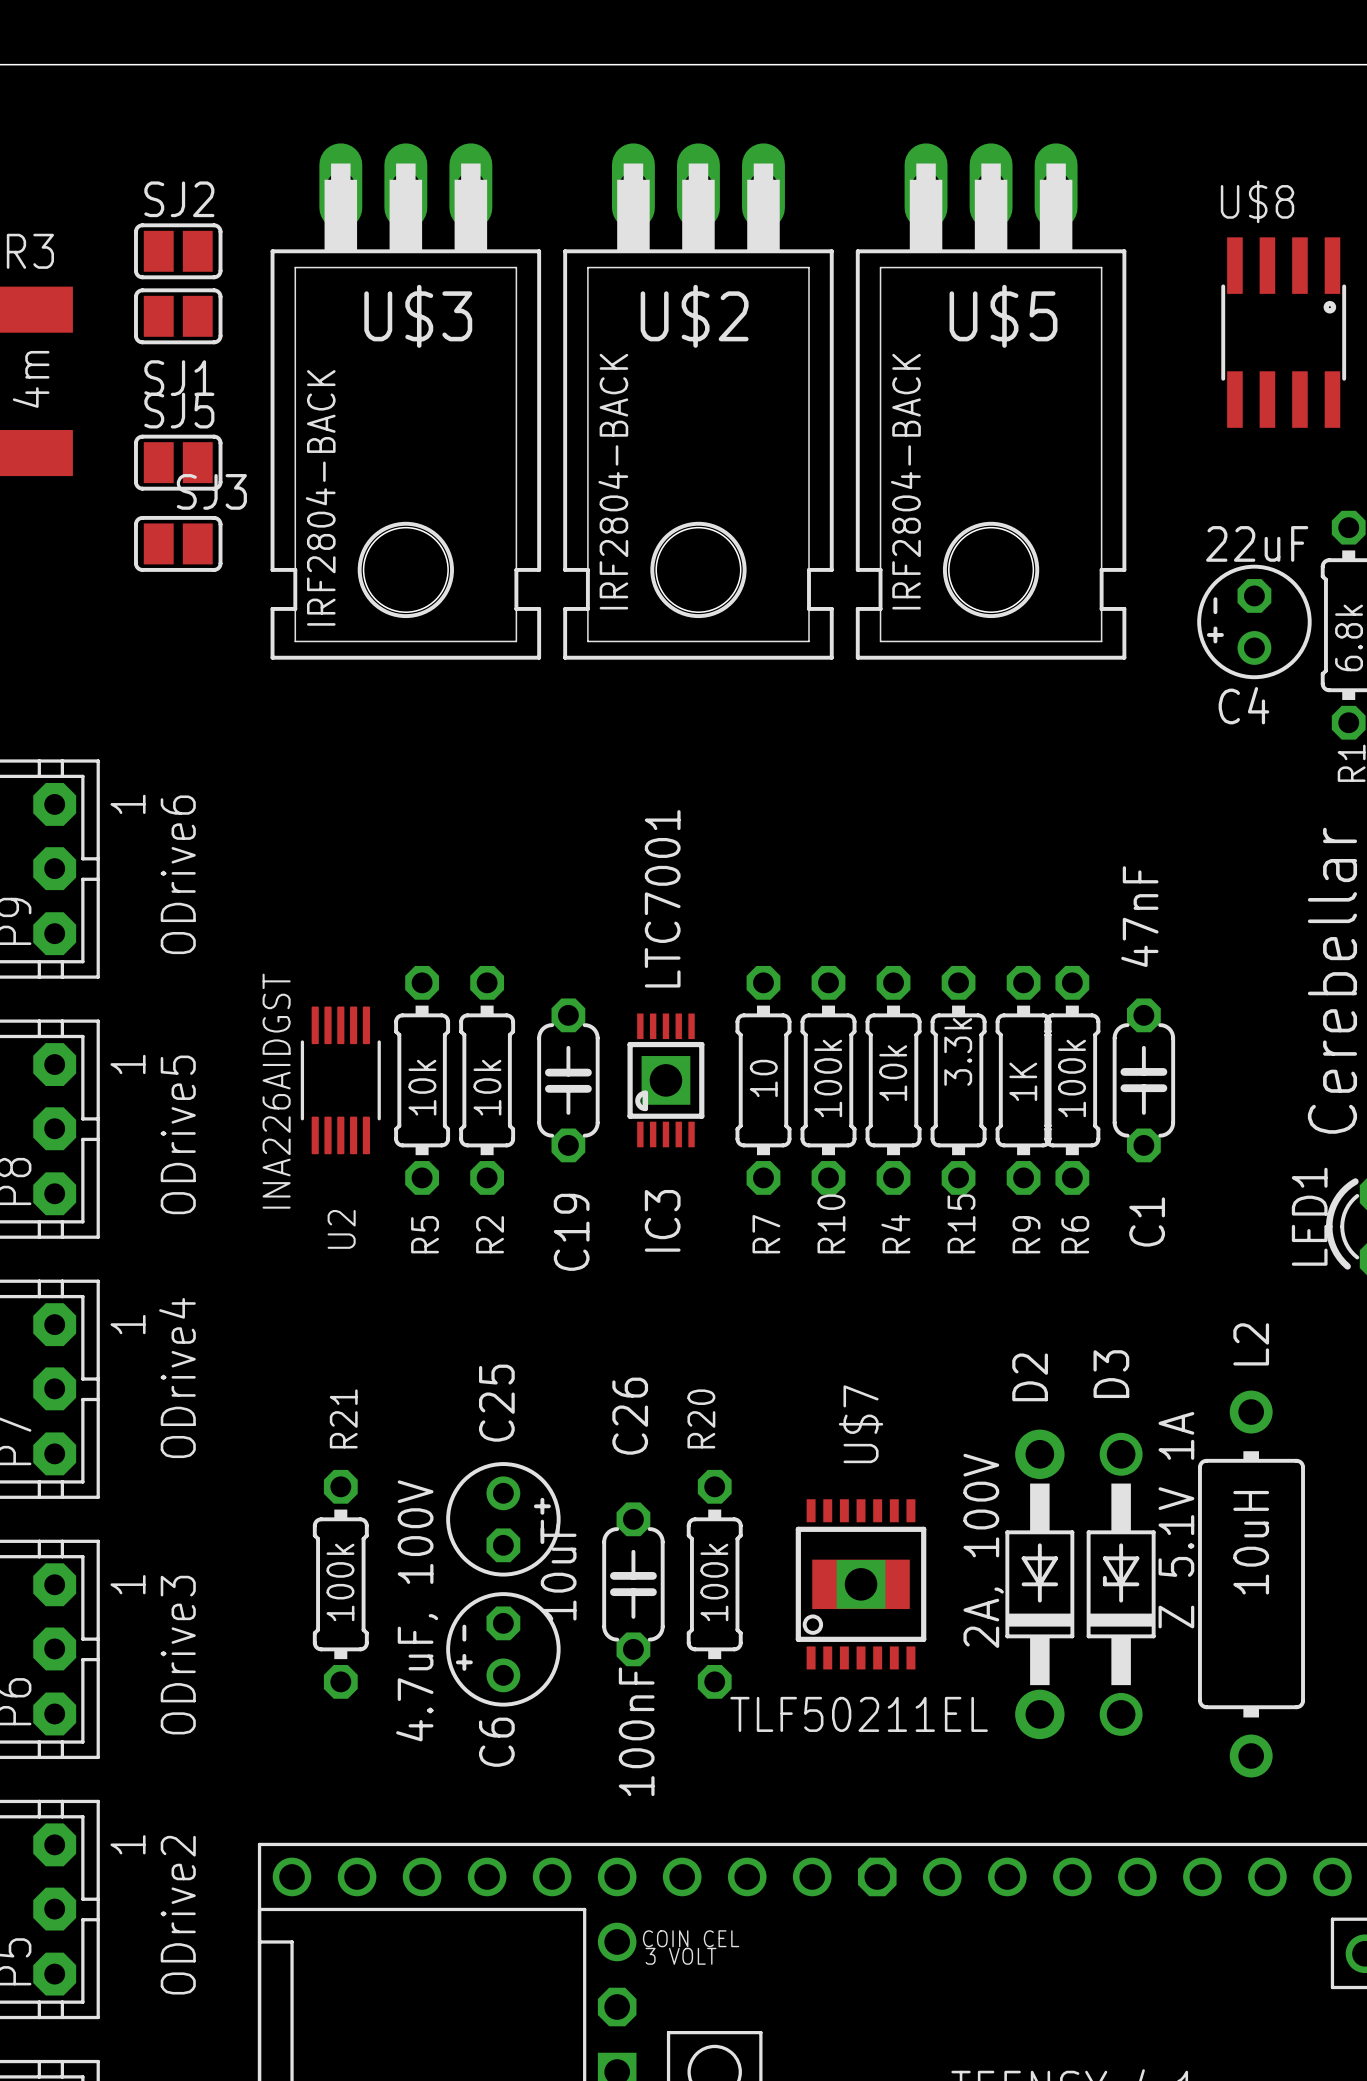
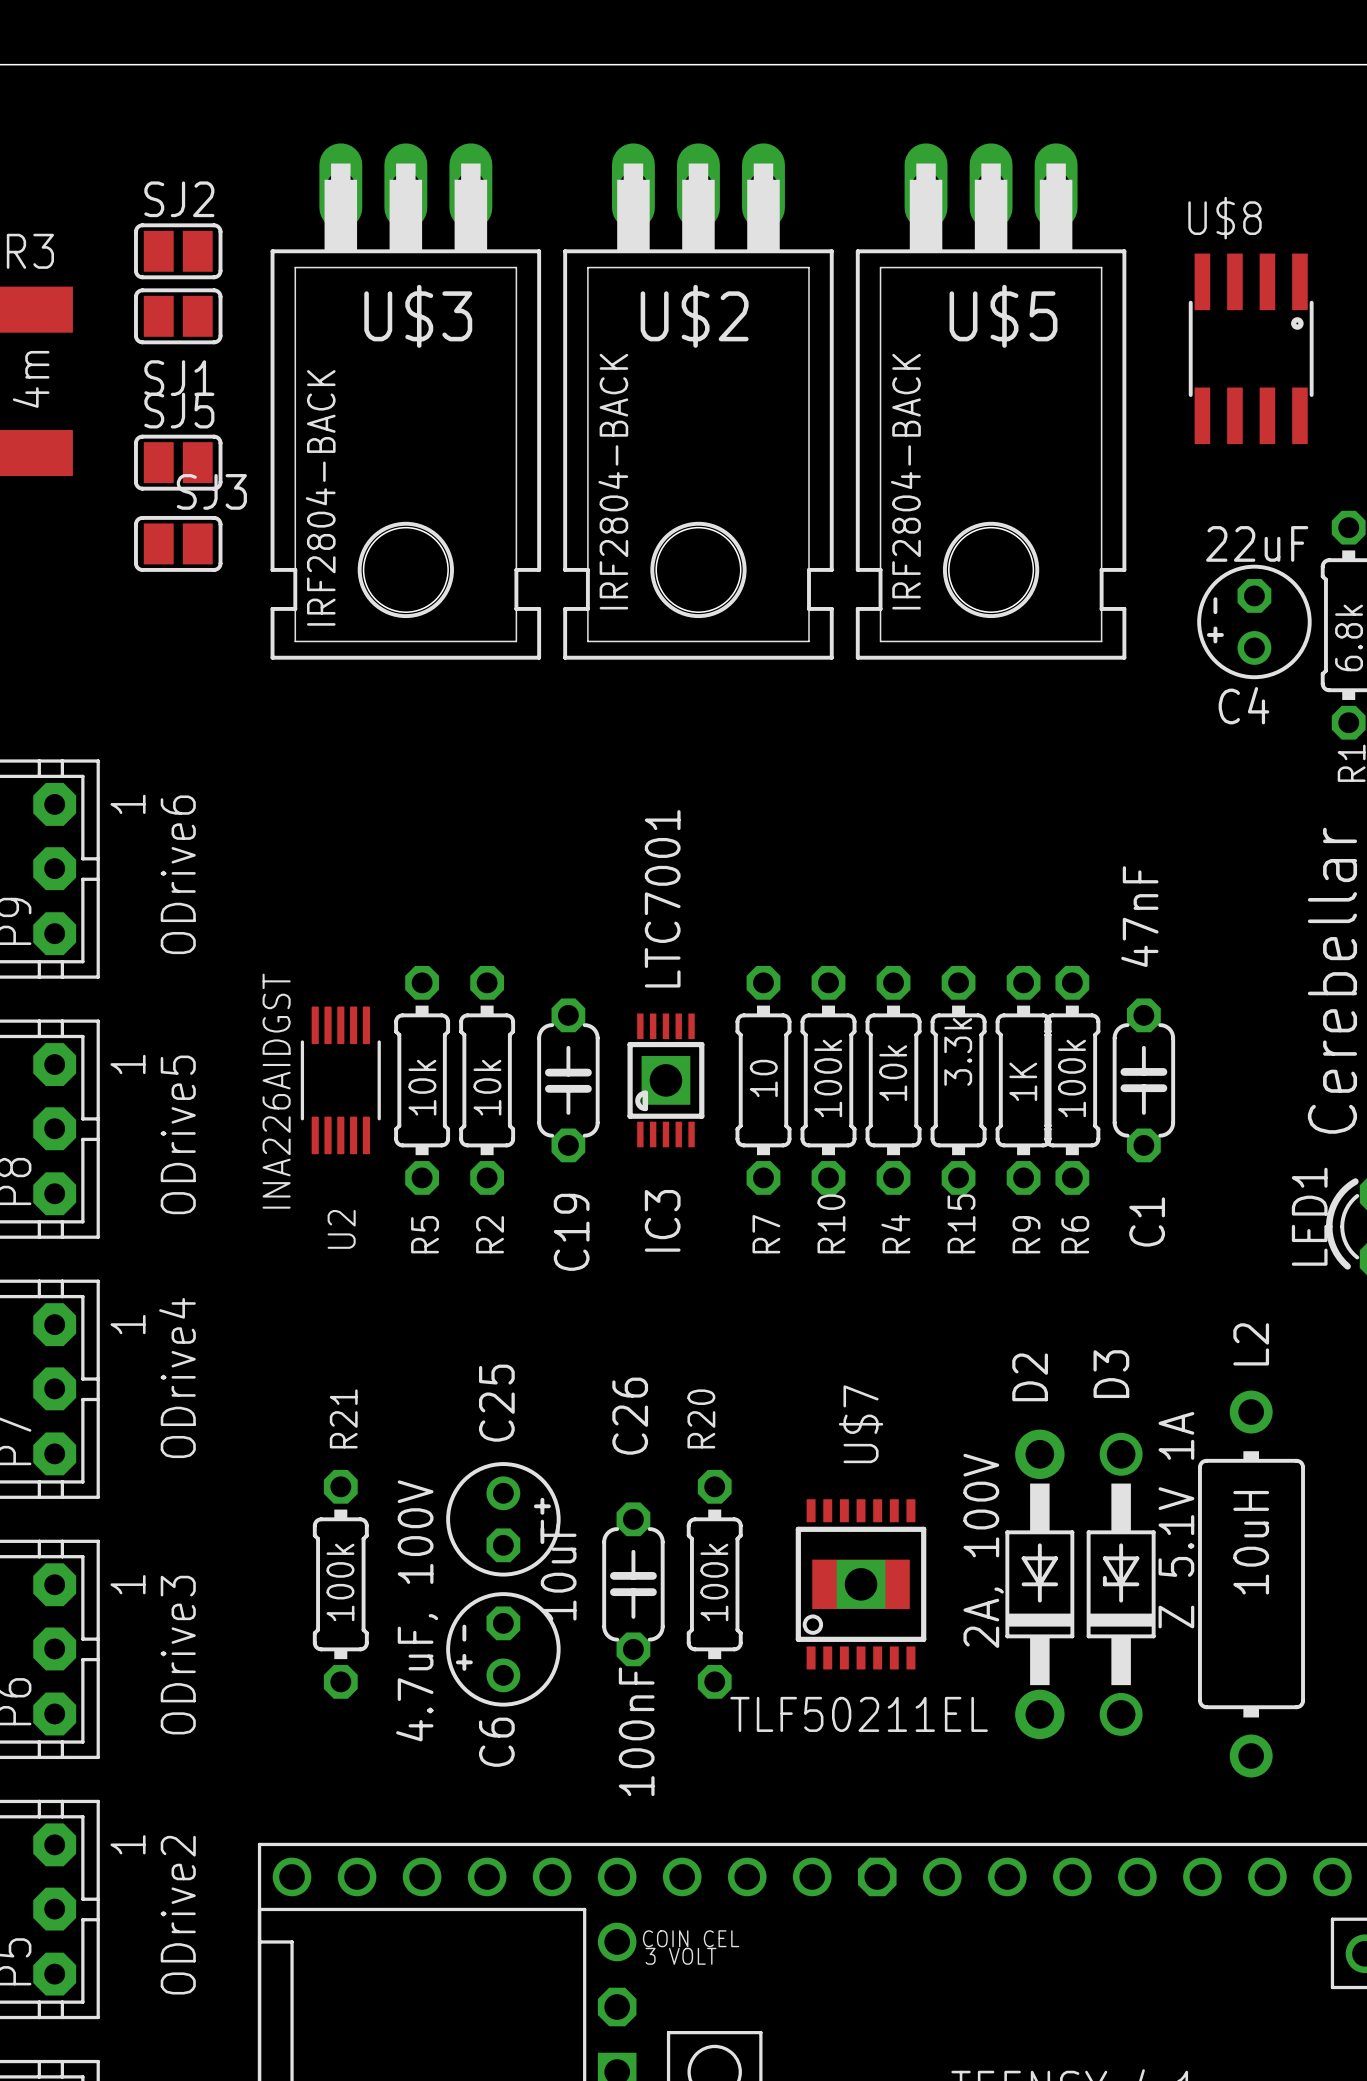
U$8 position: (1283, 332) -> (1251, 348)

